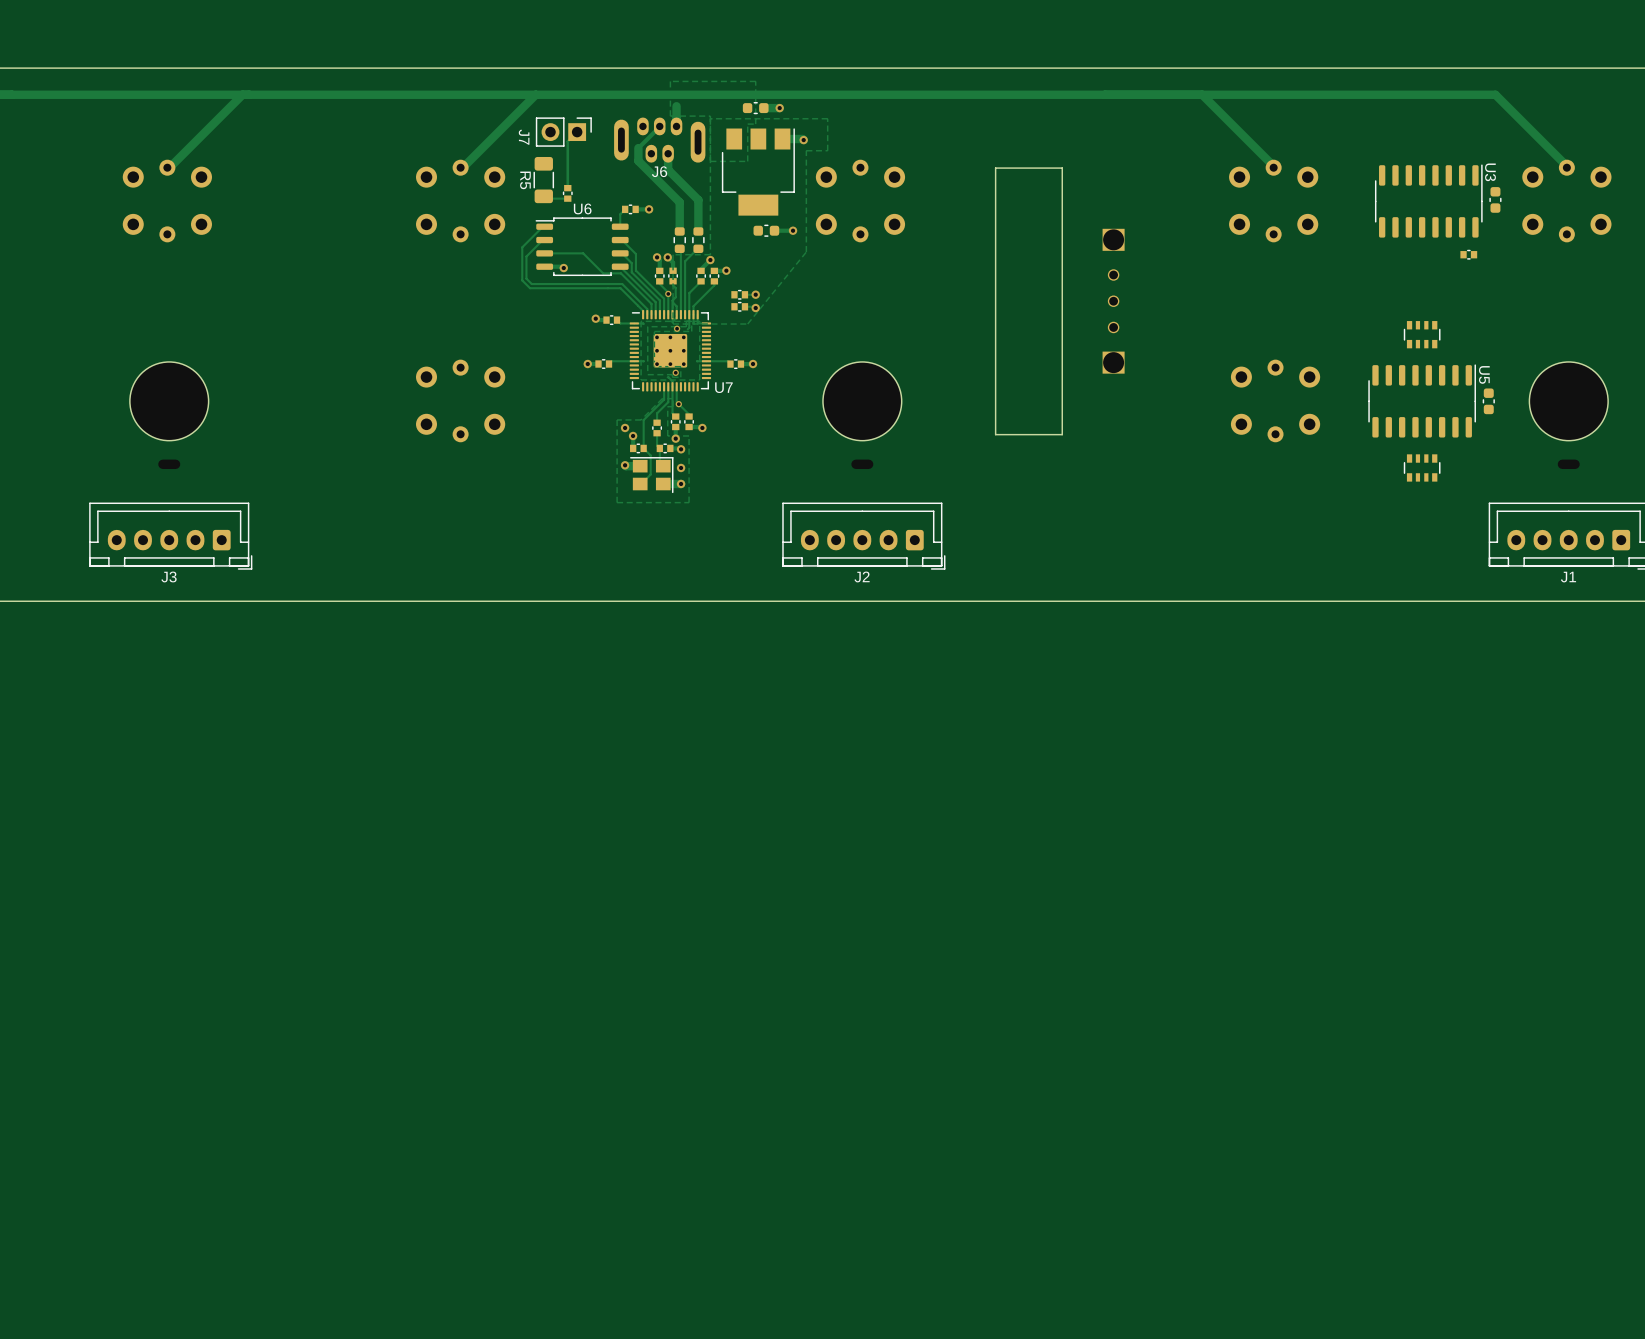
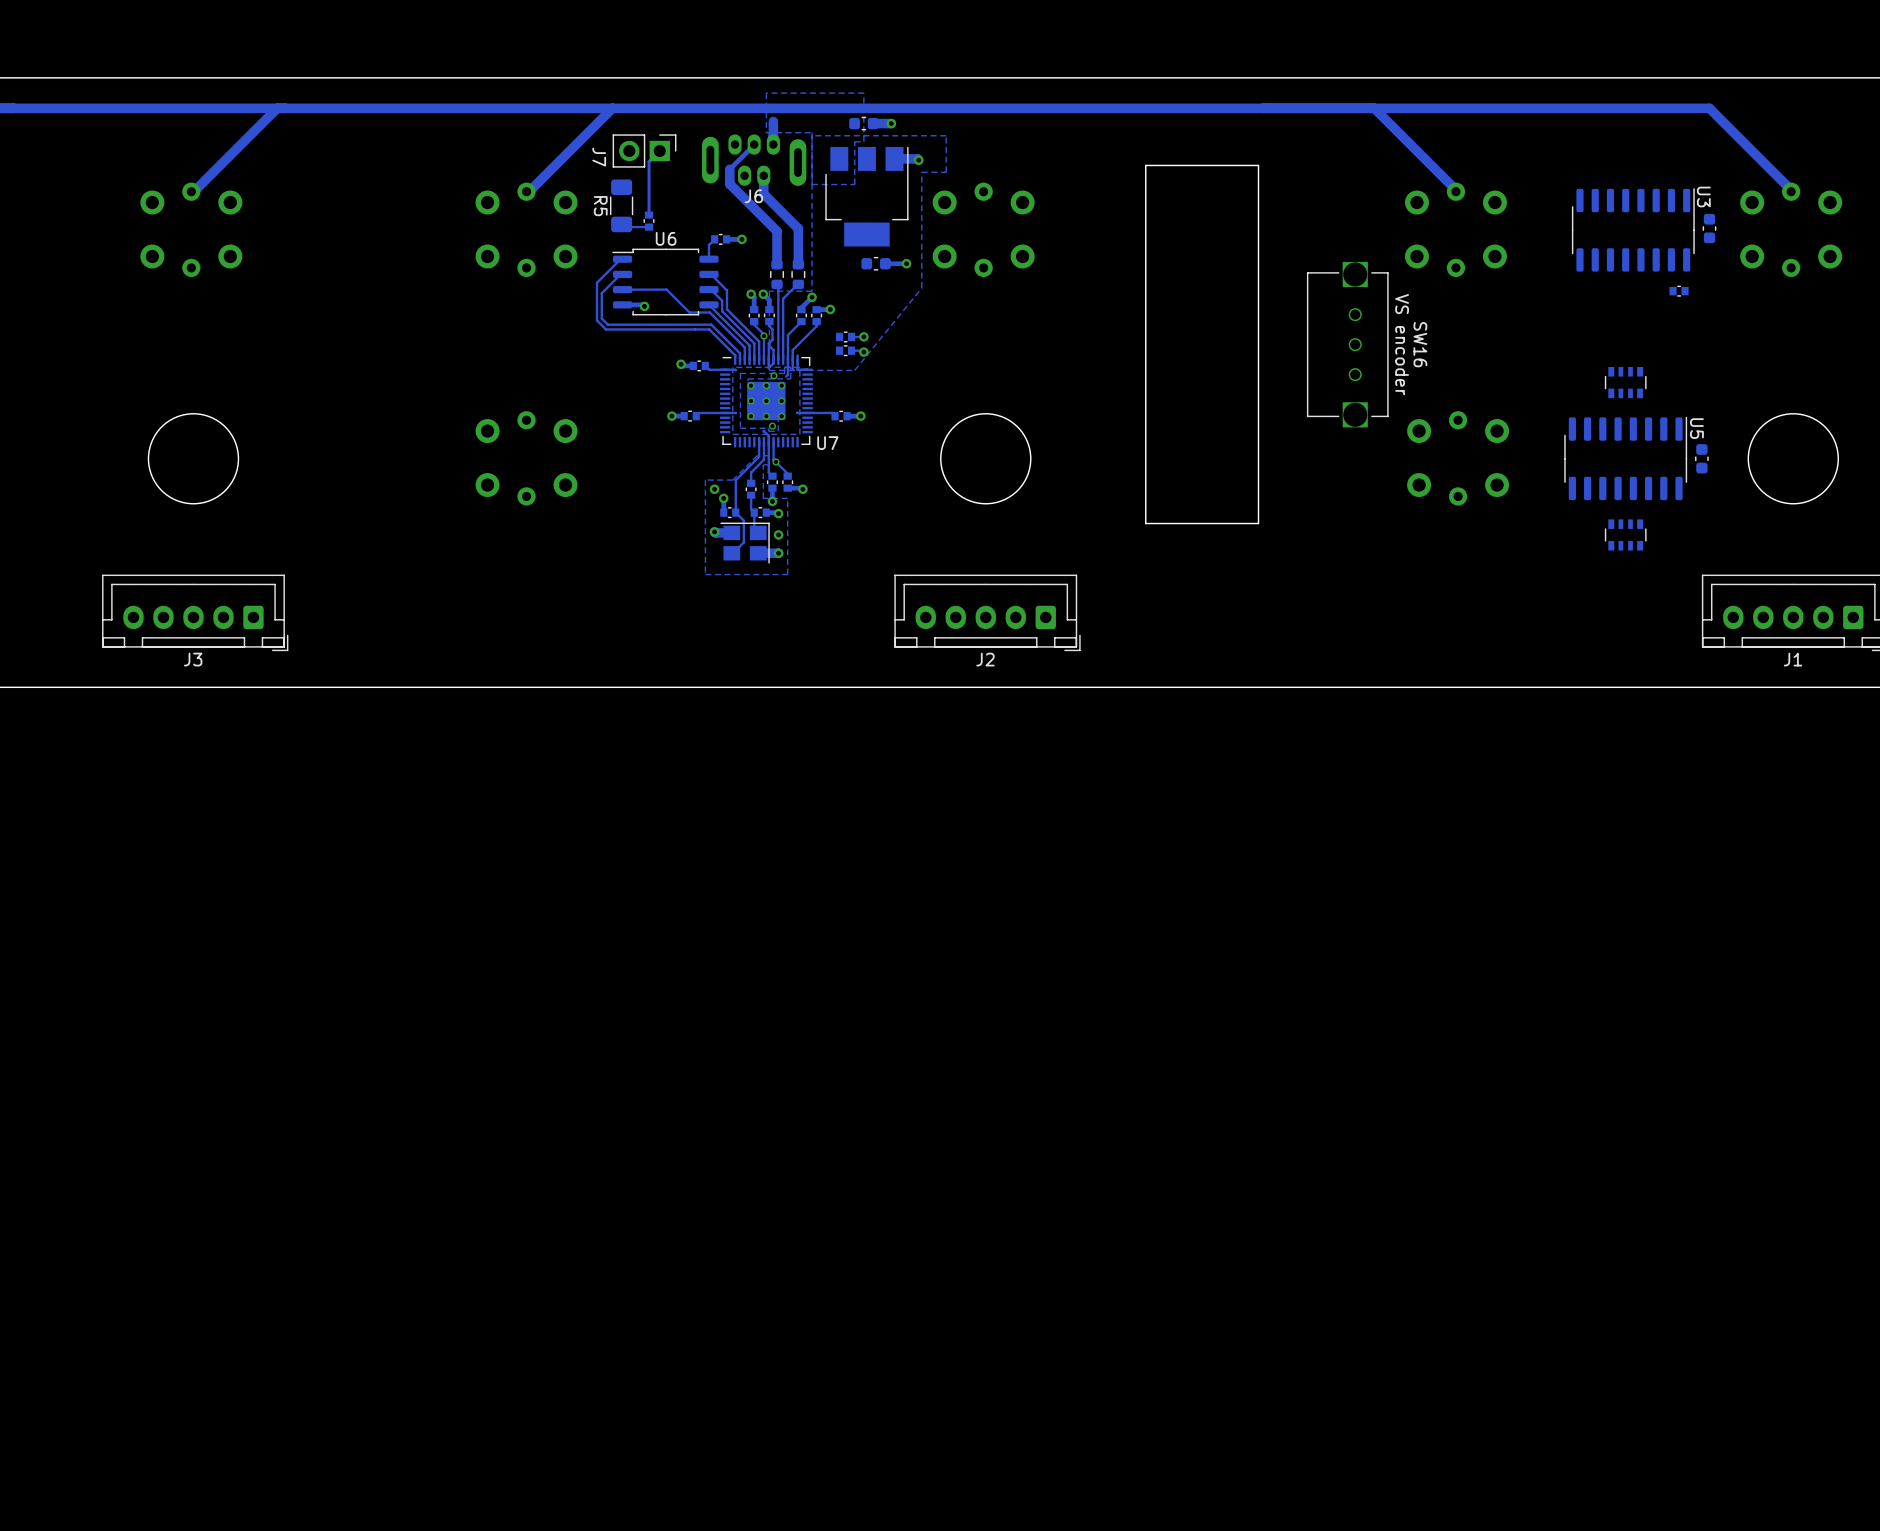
board edge: none -> (1258, 165) (1145, 165) (1145, 523) (1258, 523) (1258, 165)
board edge: (1062, 168) (995, 168) (995, 434) (1062, 434) (1062, 168) -> none
SW16 side: top (1113, 301) -> bottom (1347, 344)

